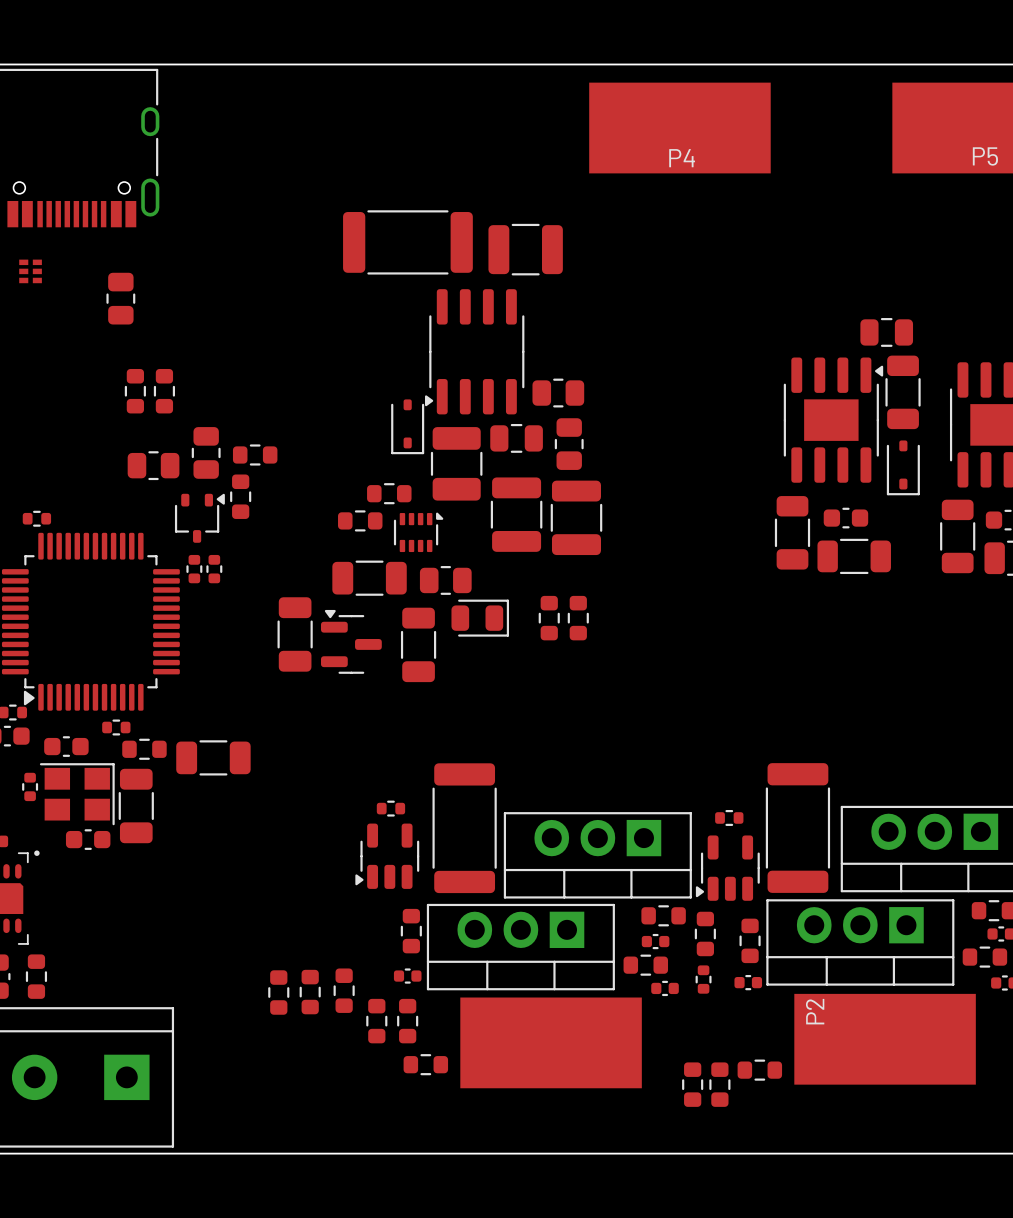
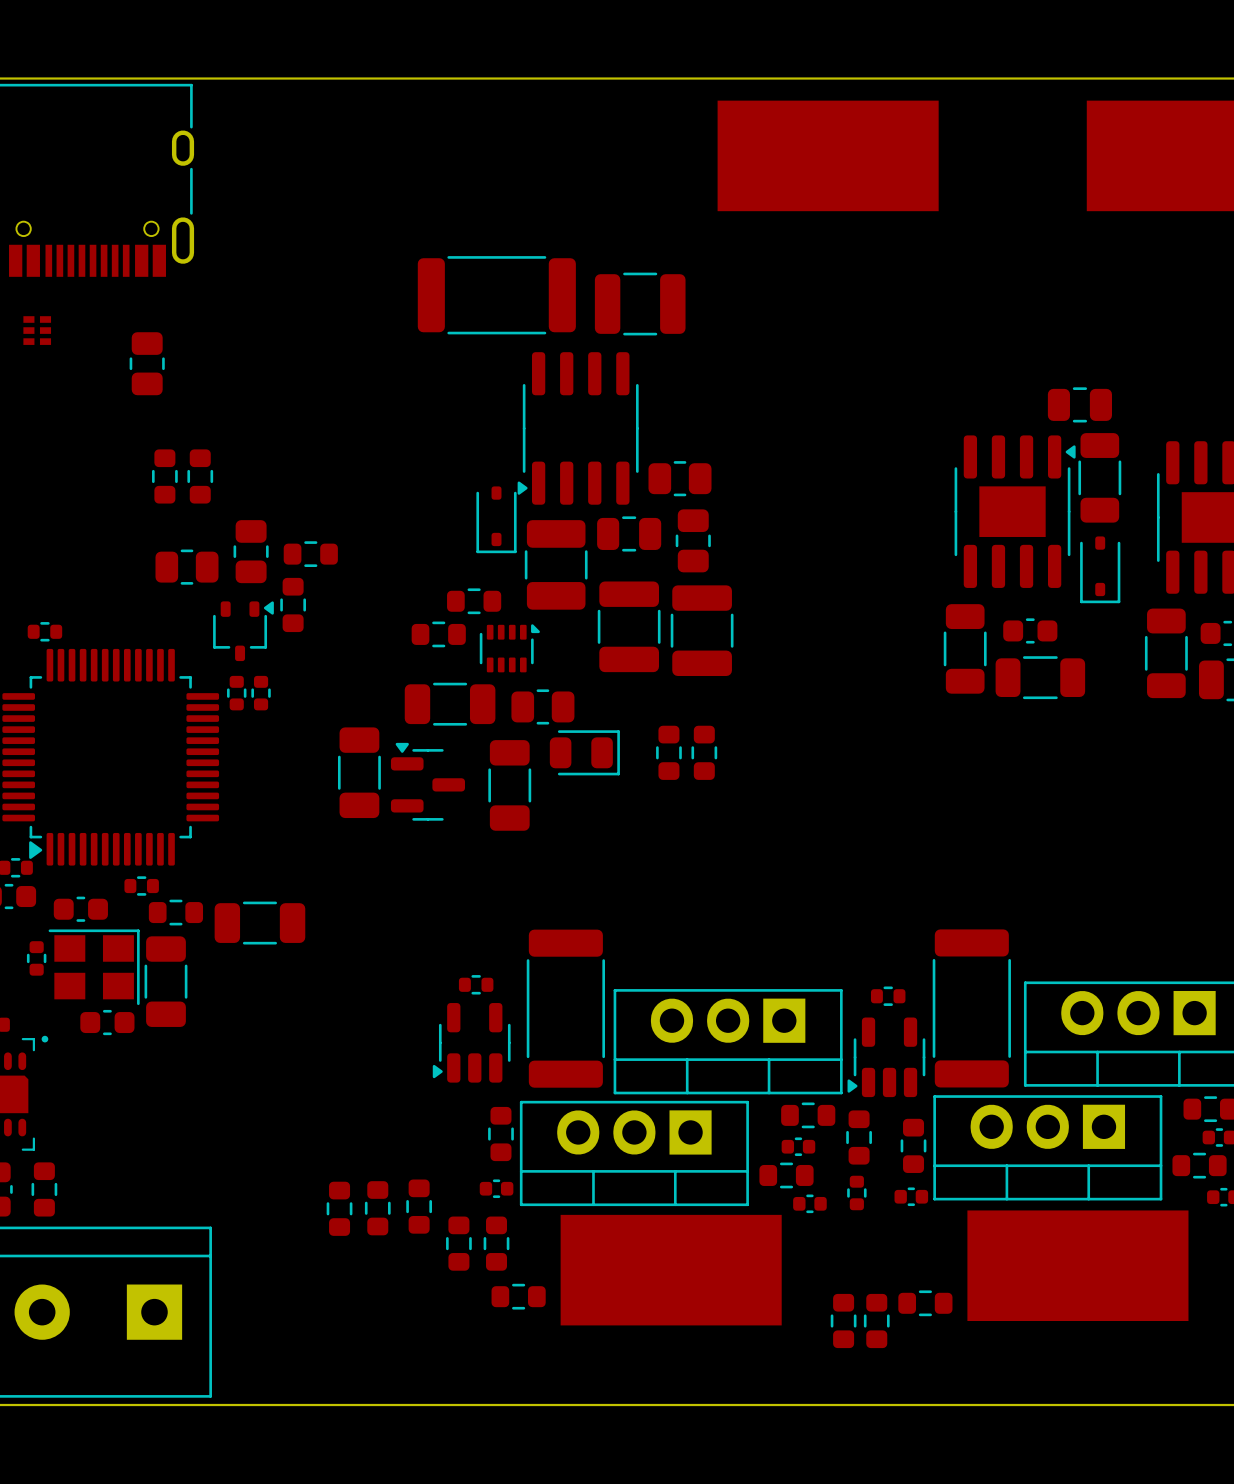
P5 name: P5 (985, 156) -> none
P4 name: P4 (682, 158) -> none
P2 name: P2 (815, 1011) -> none

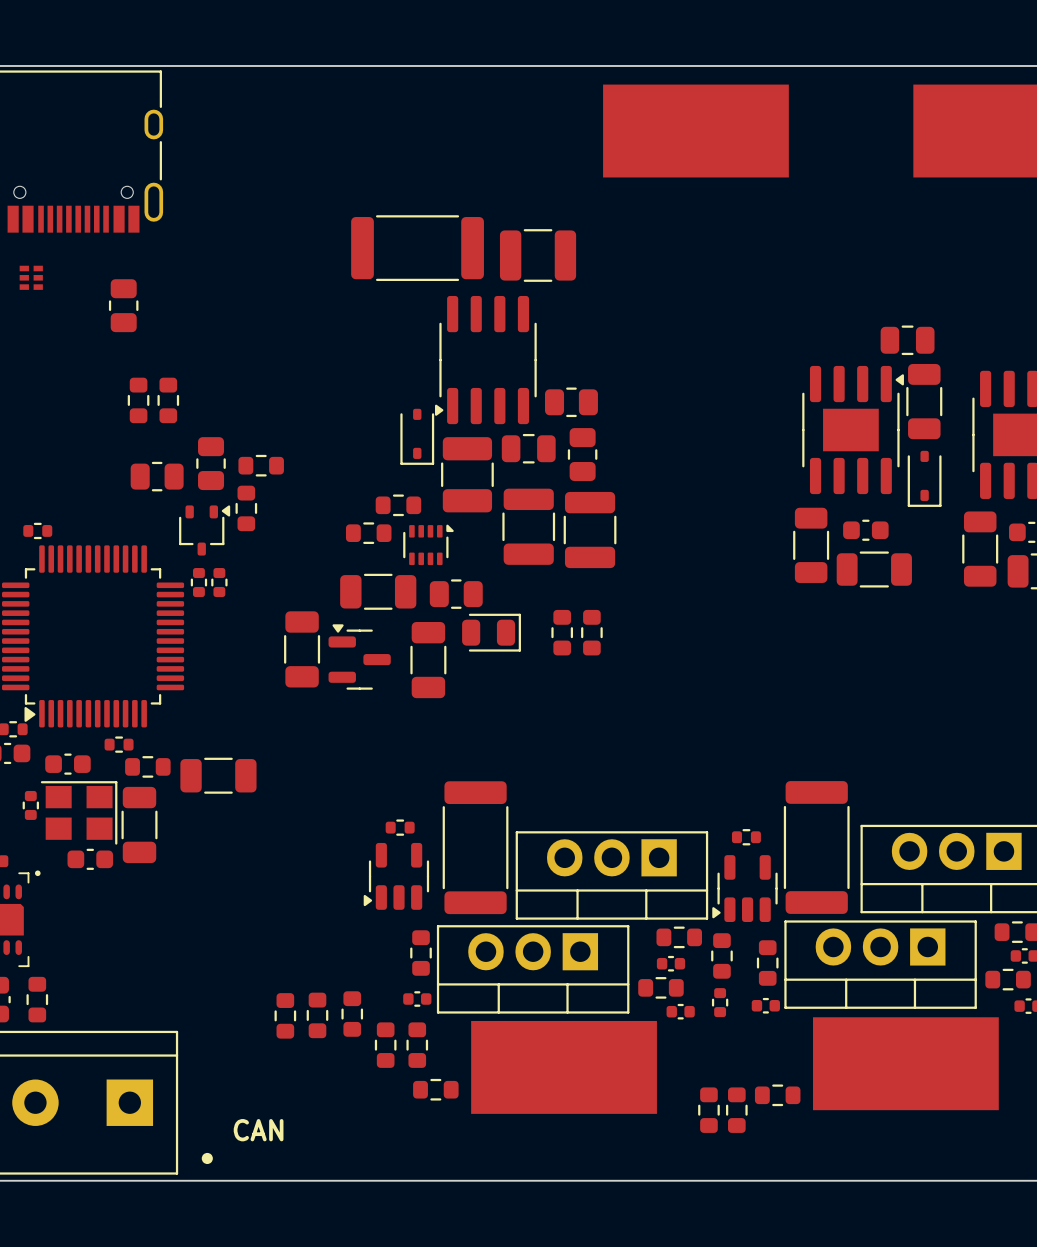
text: none -> CAN (258, 1130)
drawing: none -> [201, 1152, 213, 1165]

